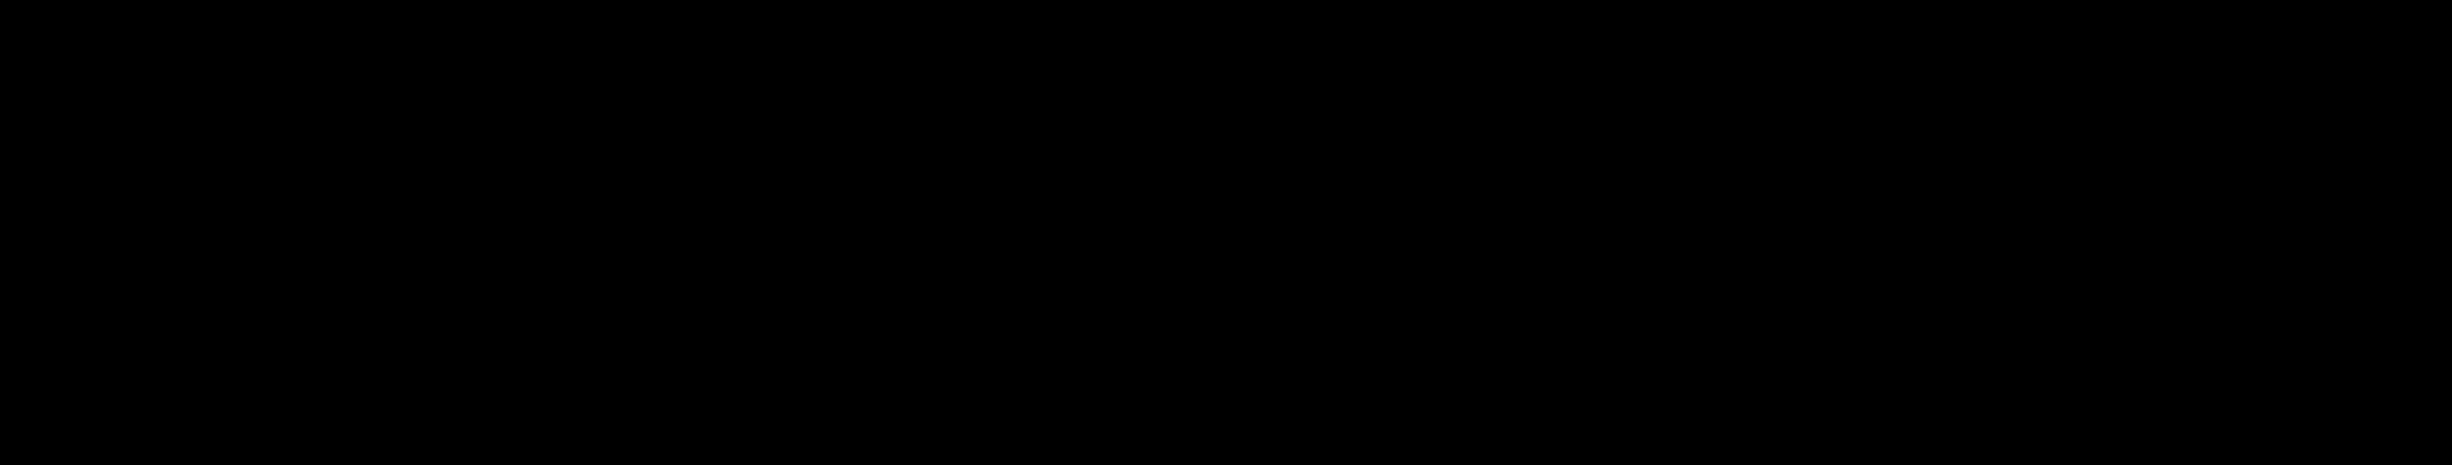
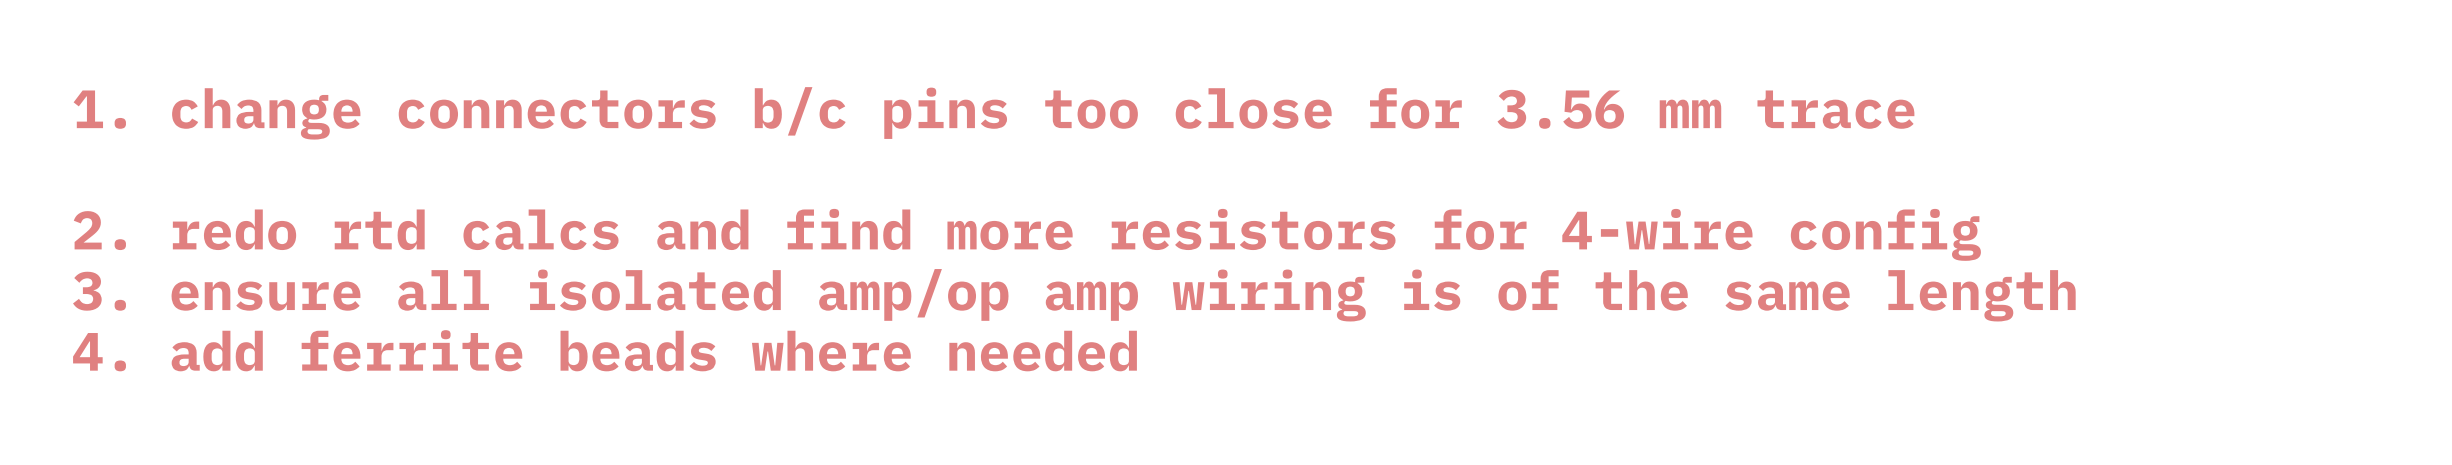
text: none -> 1. change connectors b/c pins too close for 3.56 mm trace (994, 113)
text: none -> 2. redo rtd calcs and find more resistors for 4-wire config (1027, 234)
text: none -> 3. ensure all isolated amp/op amp wiring is of the same length (1074, 295)
text: none -> 4. add ferrite beads where needed (604, 350)

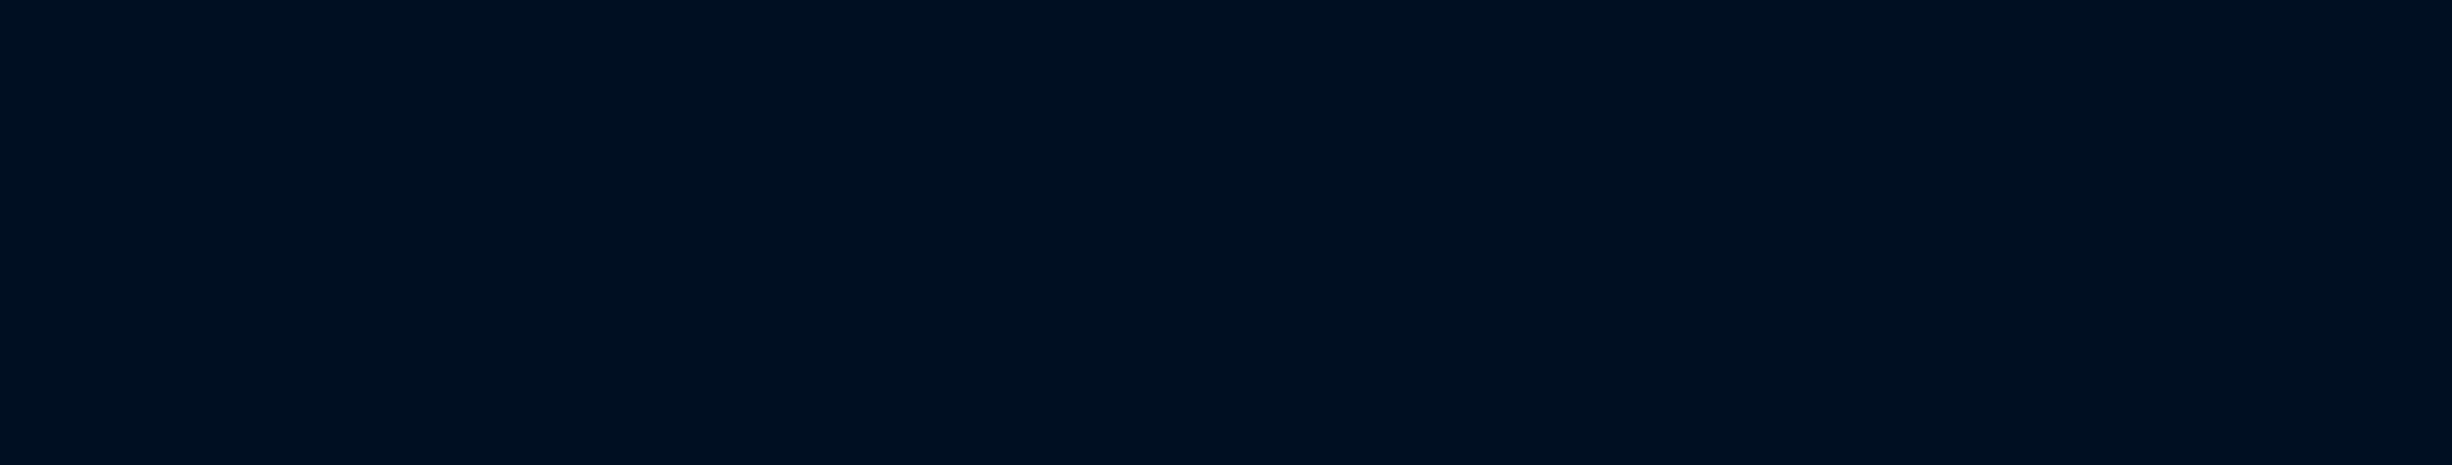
text: 1. change connectors b/c pins too close for 3.56 mm trace (994, 113) -> none
text: 2. redo rtd calcs and find more resistors for 4-wire config (1027, 234) -> none
text: 3. ensure all isolated amp/op amp wiring is of the same length (1074, 295) -> none
text: 4. add ferrite beads where needed (604, 350) -> none

